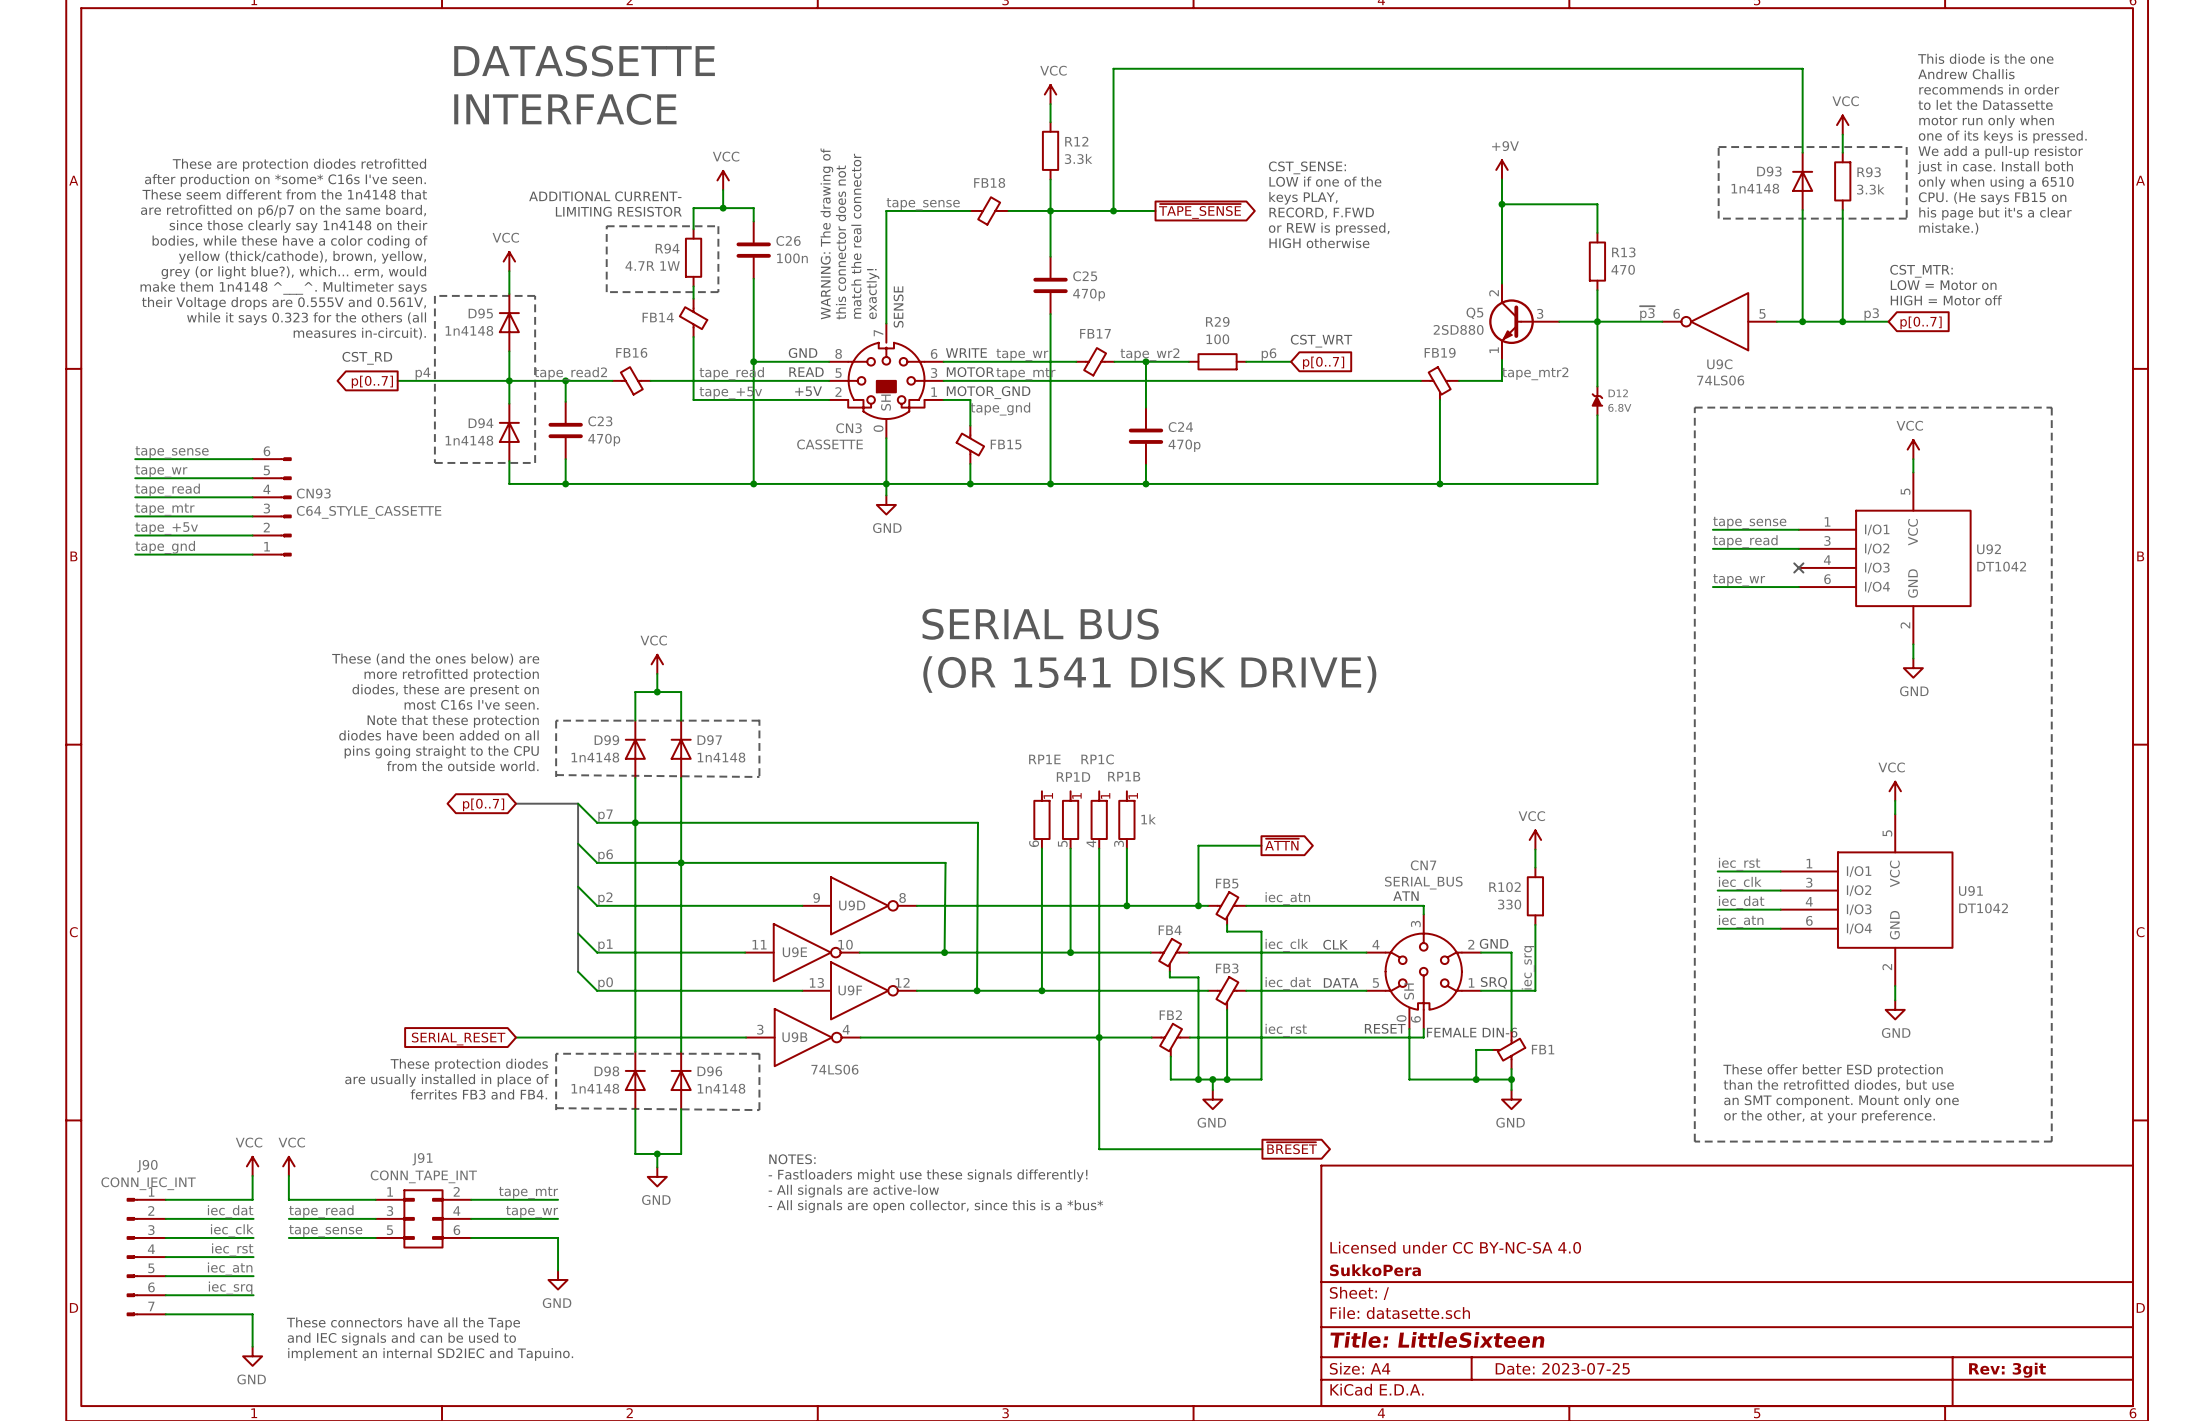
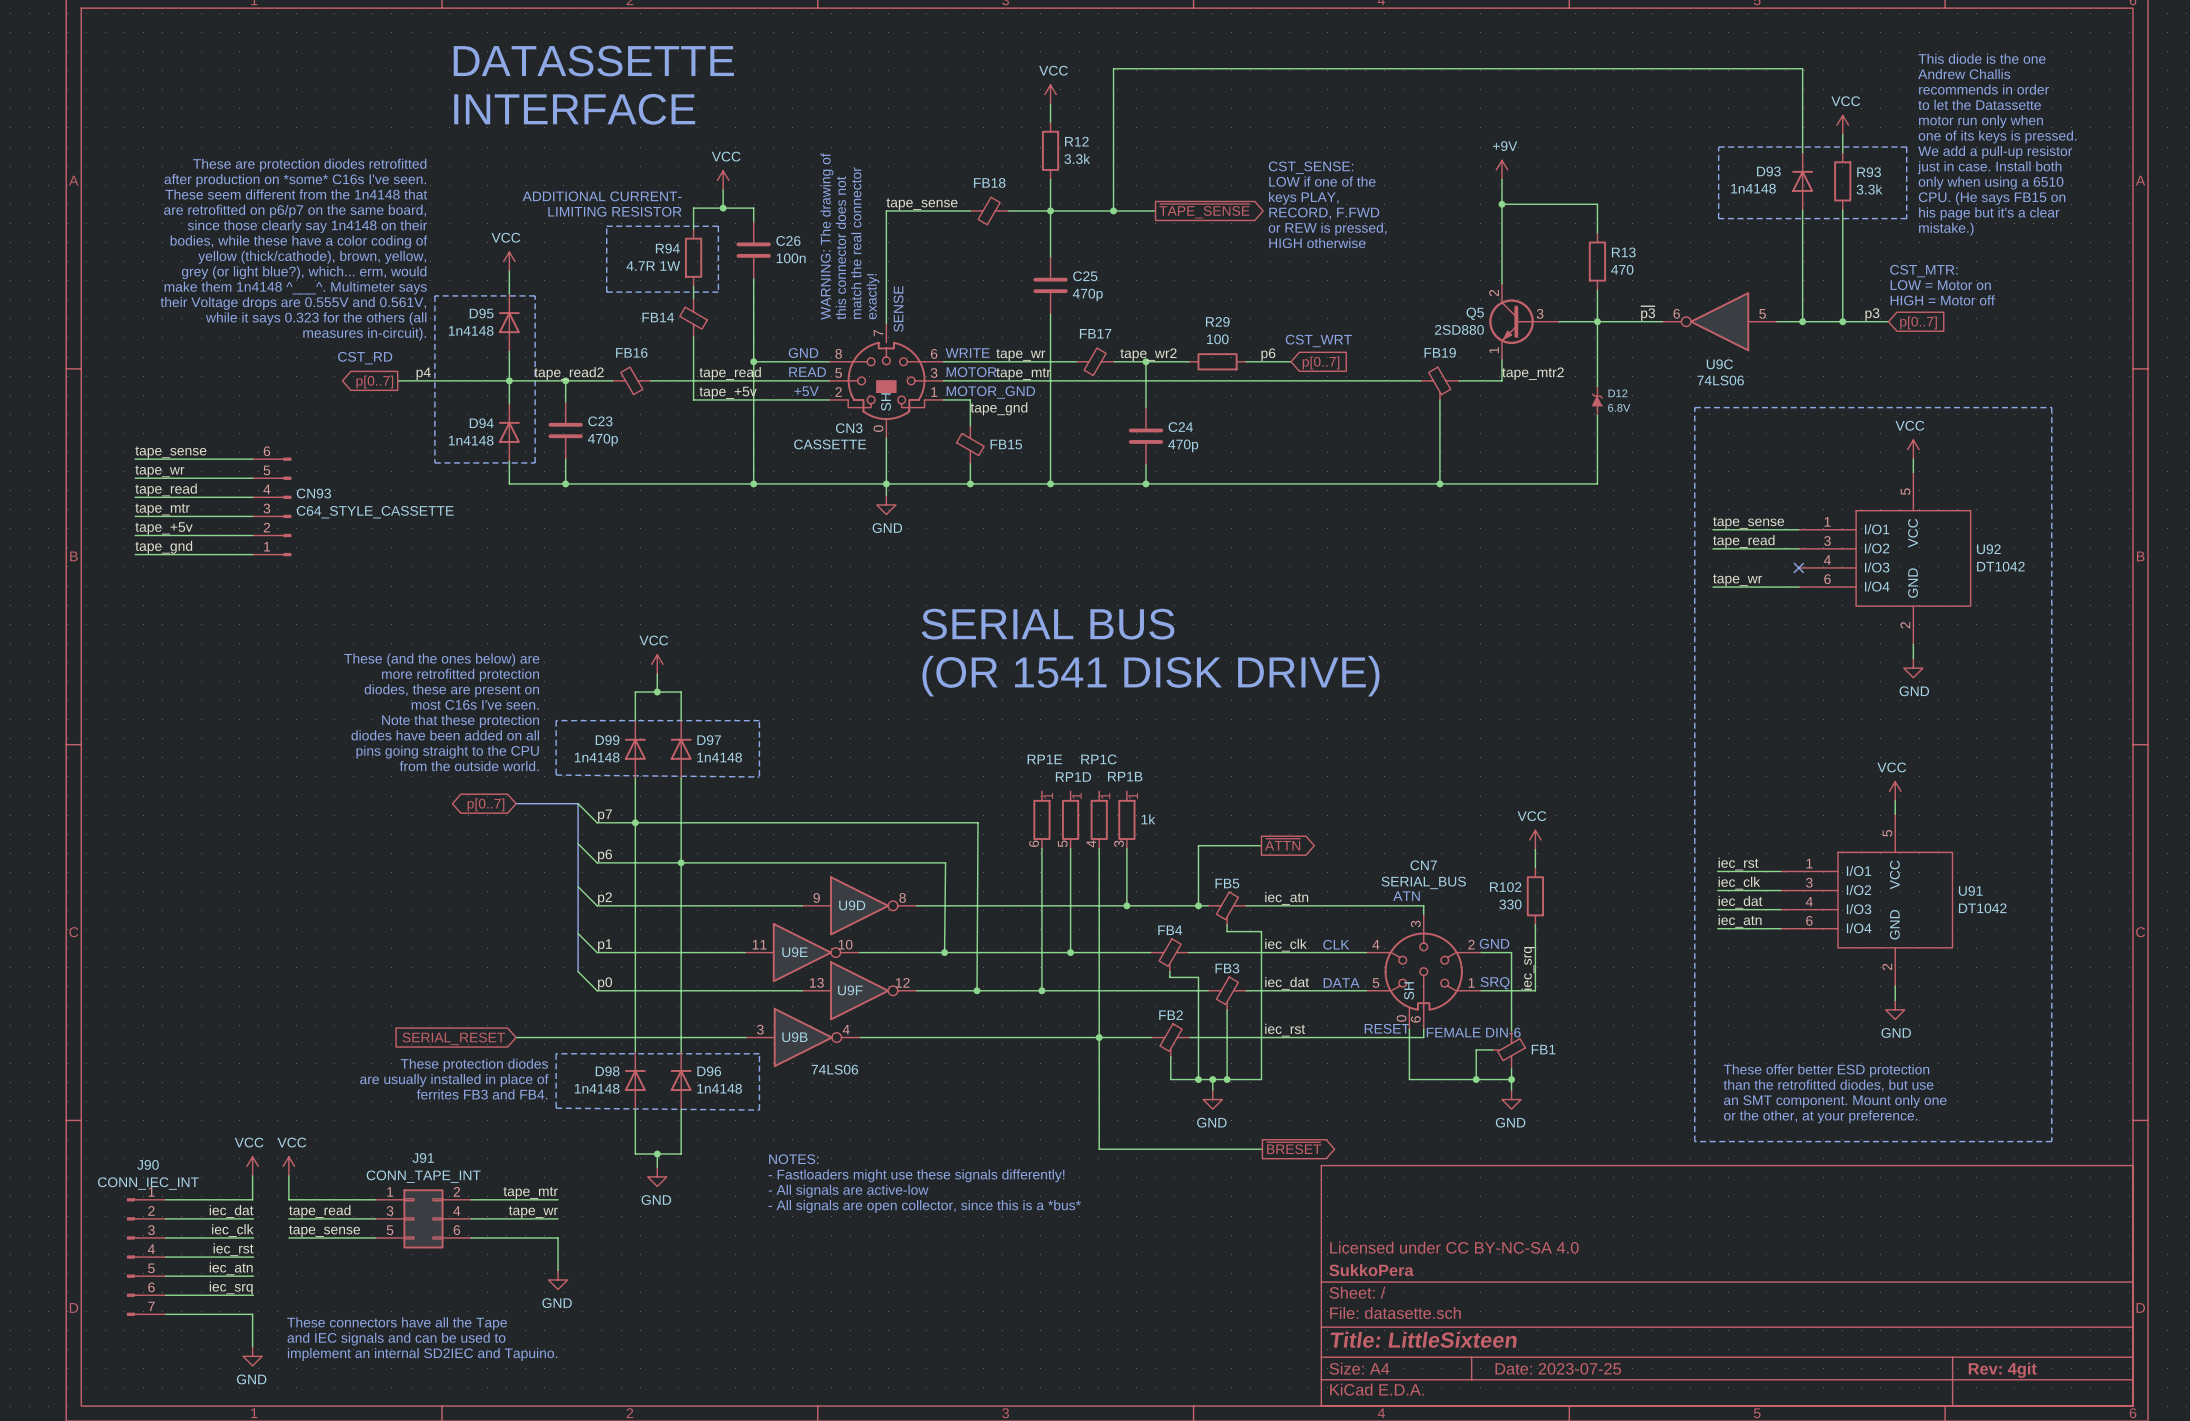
title block: Rev: 3git (2007, 1370) -> Rev: 4git (2002, 1370)

